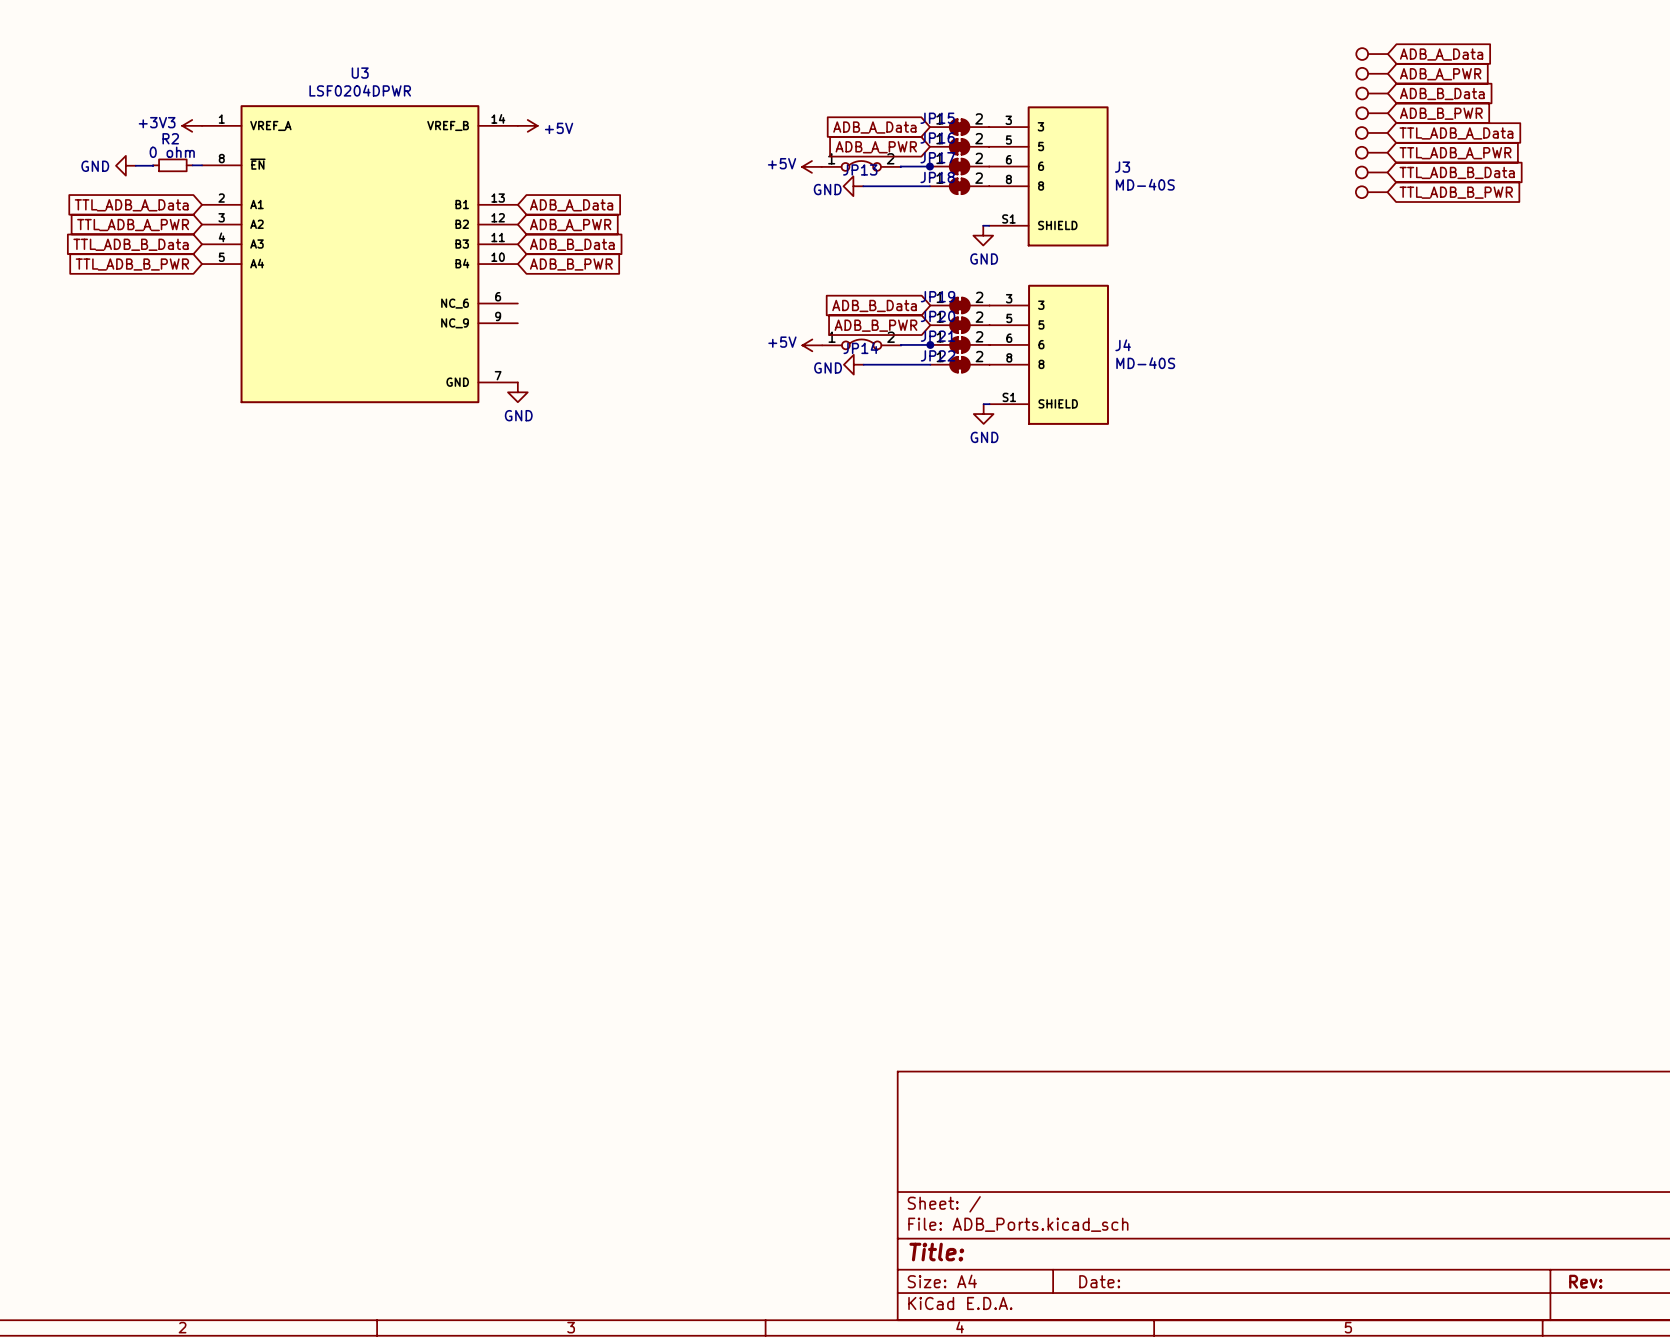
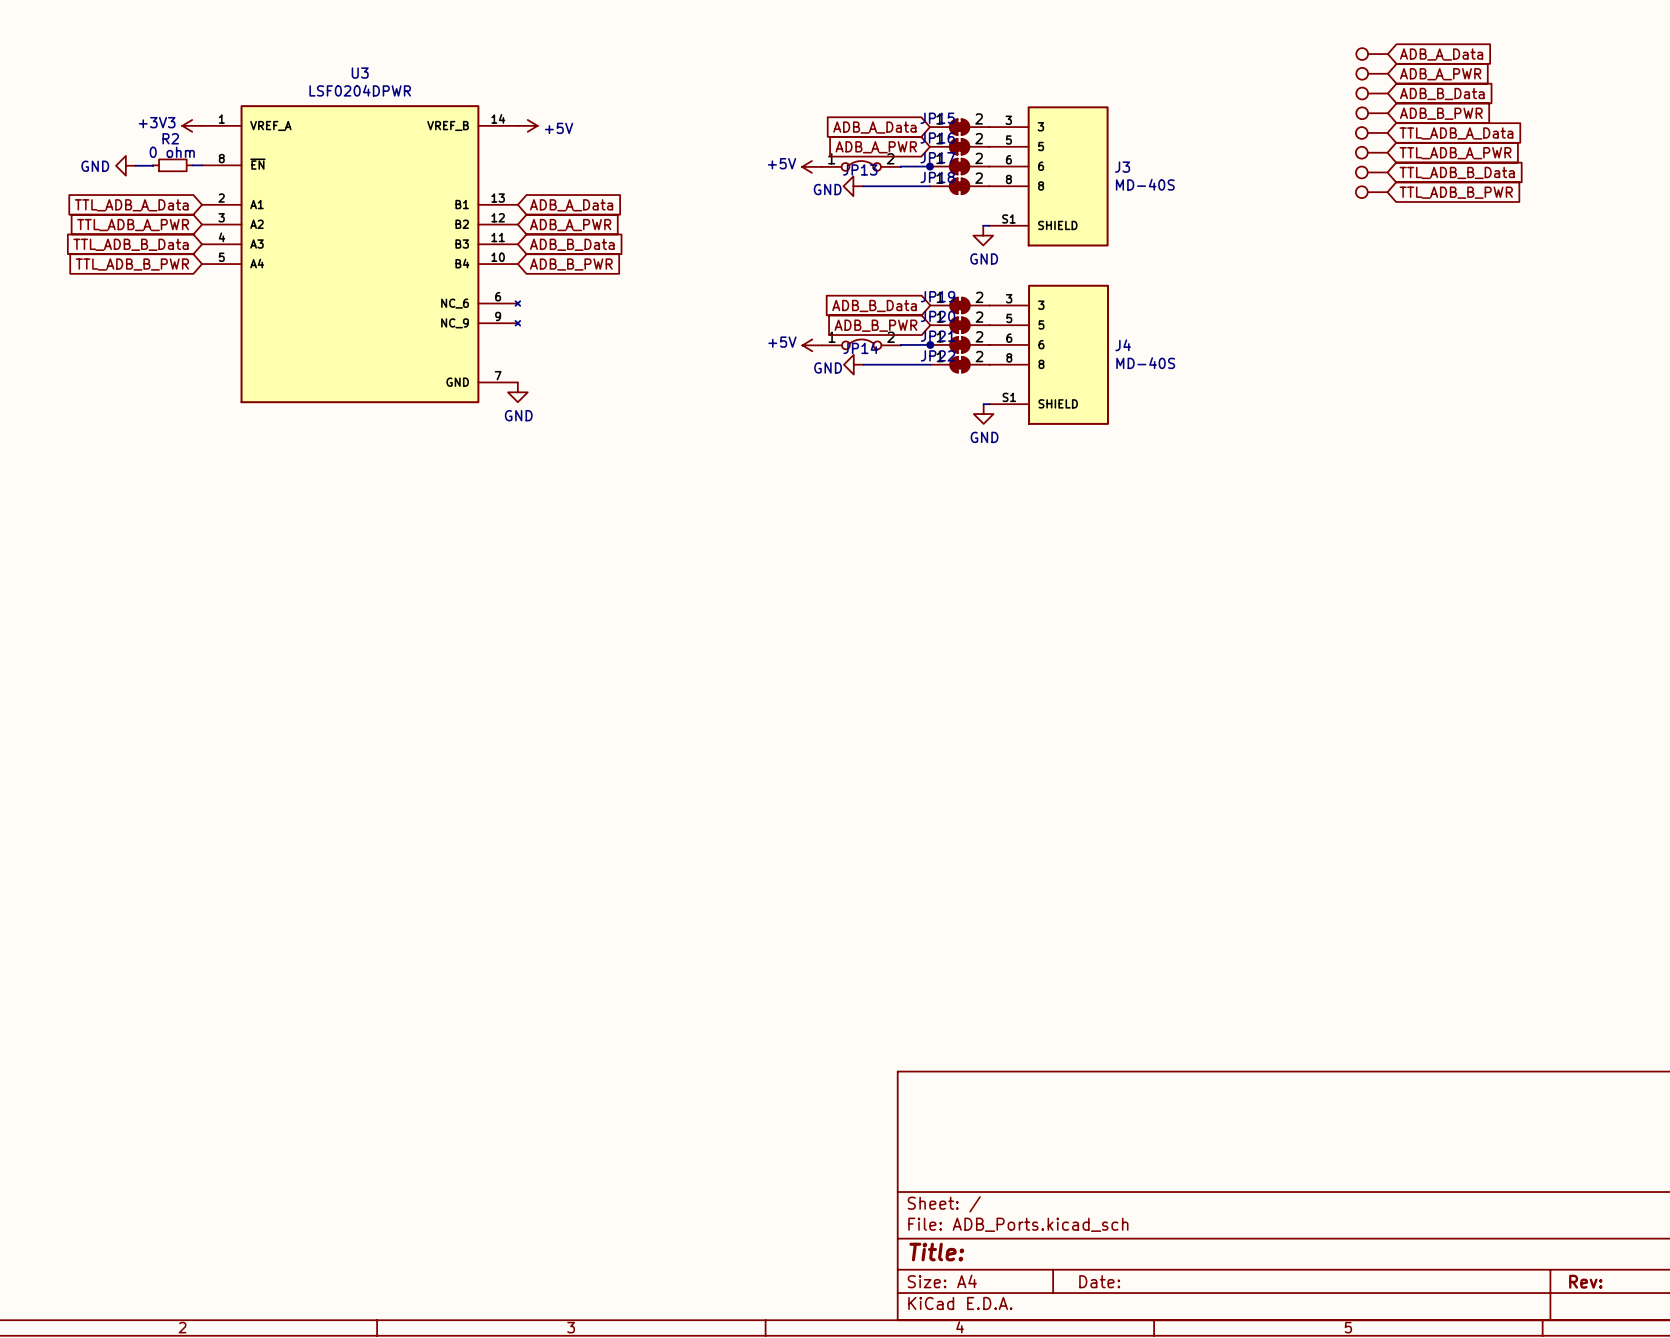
U3 symbol: [202, 105, 518, 404] -> [202, 105, 521, 404]

